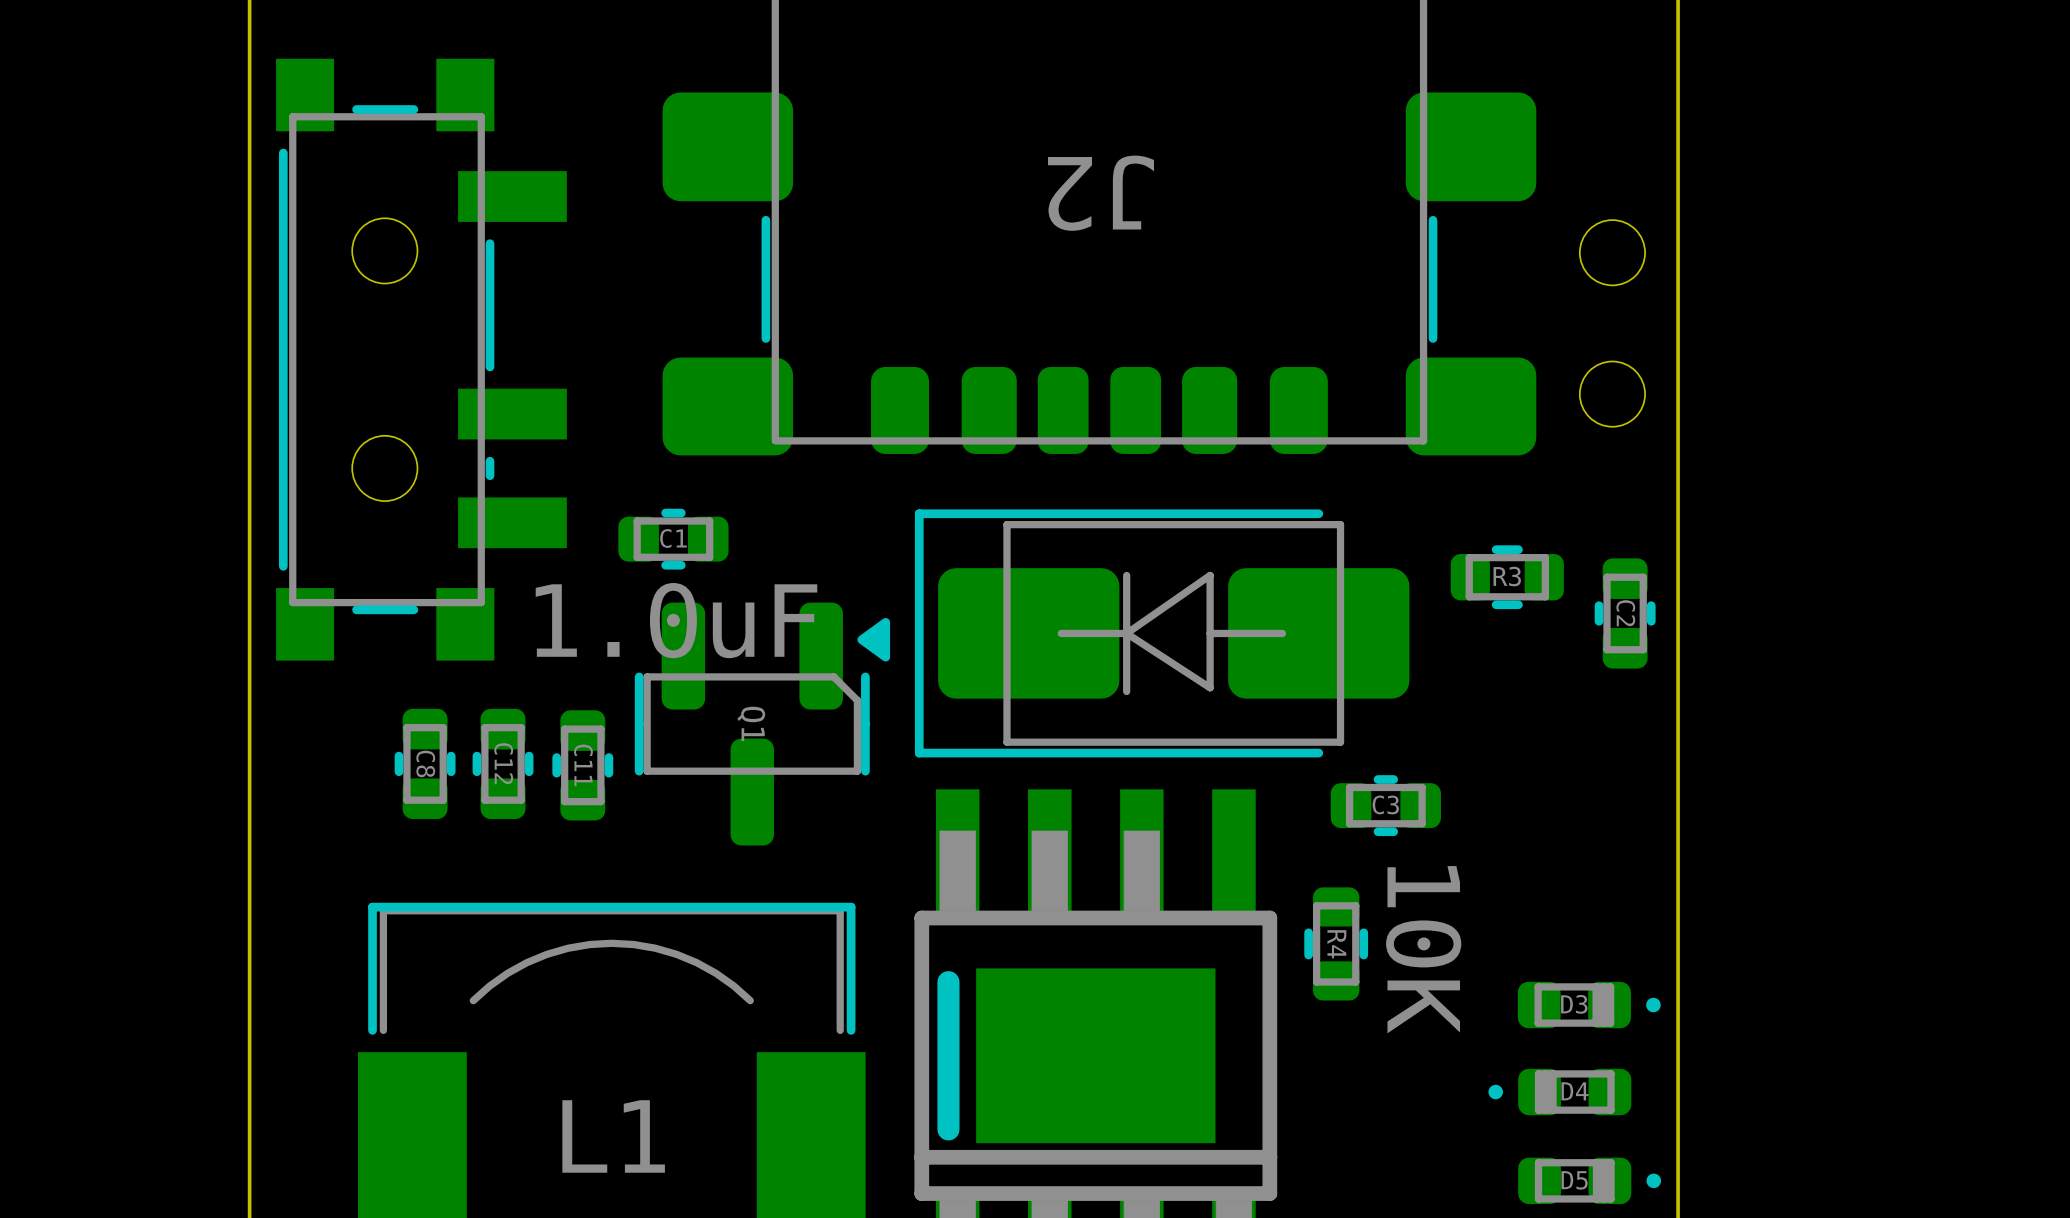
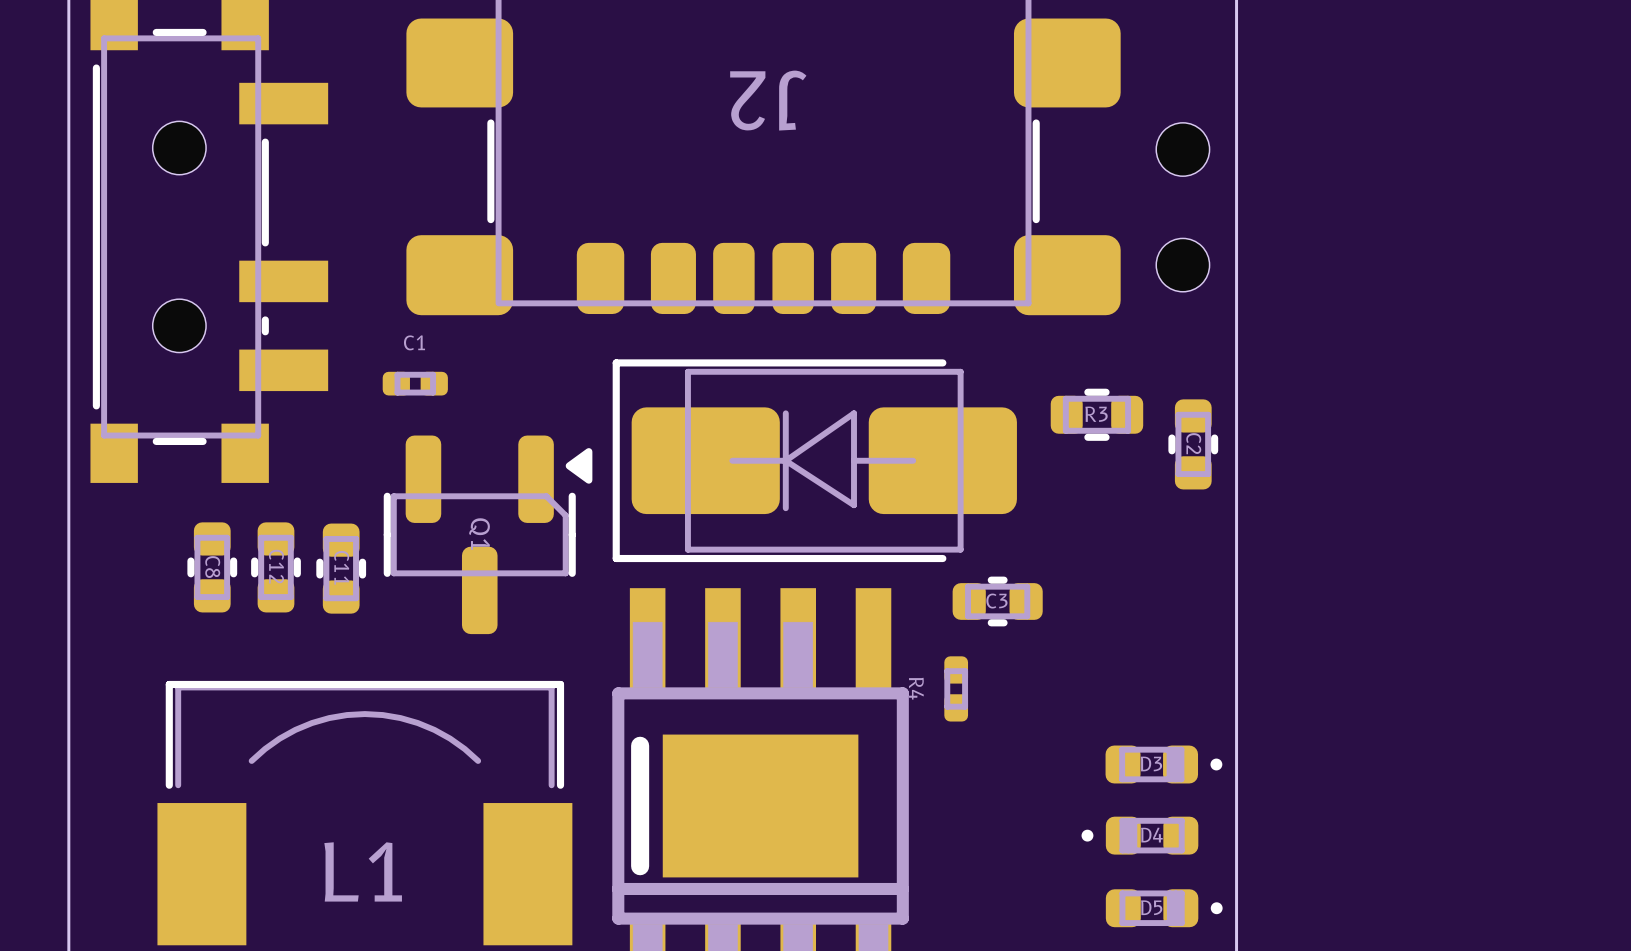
C1 footprint: [618, 508, 729, 570] -> [382, 371, 448, 396]
C1 value: 1.0uF (676, 620) -> none
R4 footprint: [1304, 887, 1369, 1001] -> [944, 656, 969, 722]
R4 value: 10K (1423, 949) -> none

